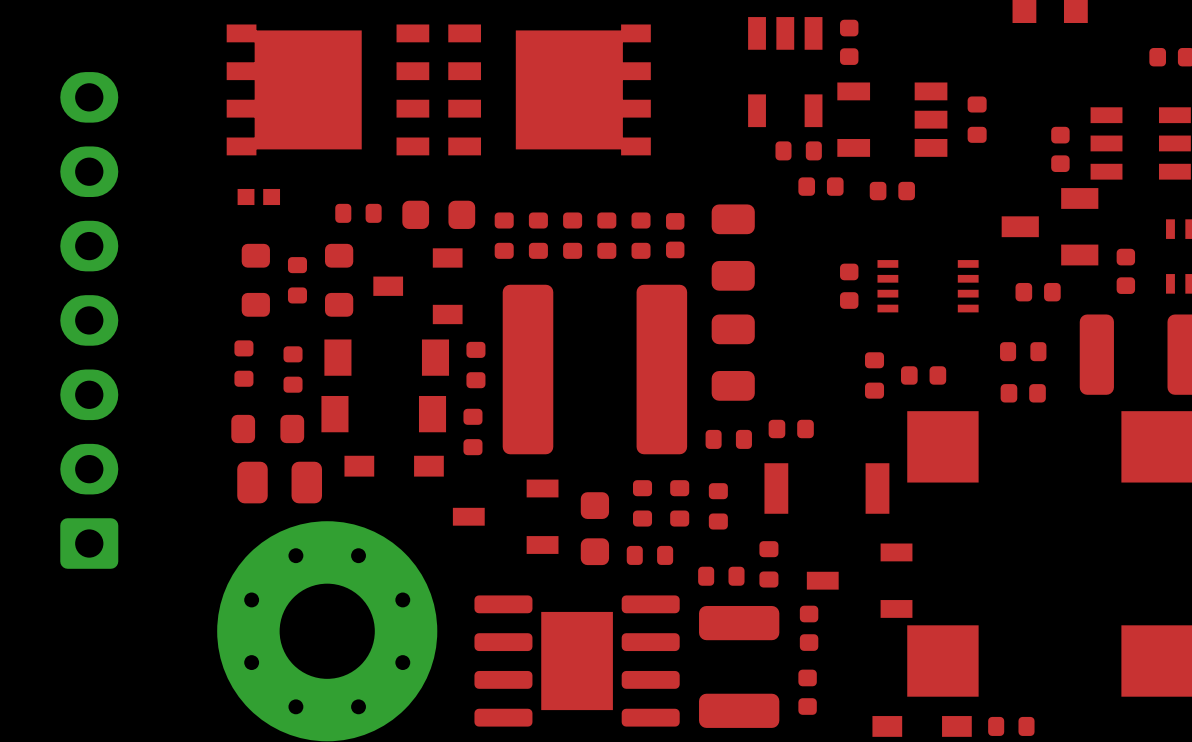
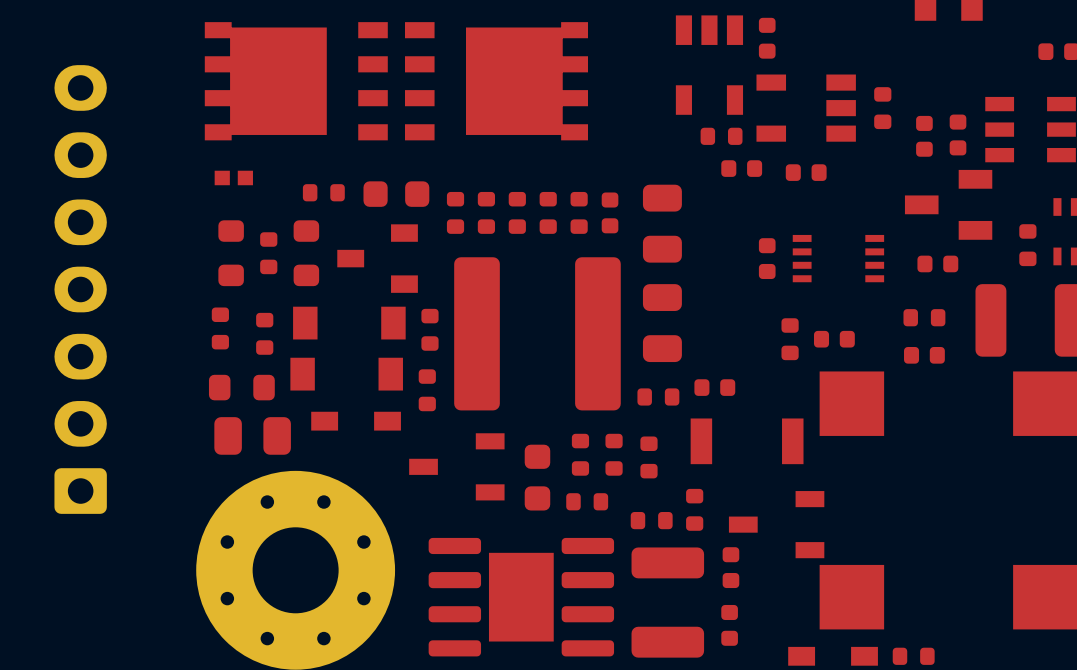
part: none -> (924, 136)
part footprint: [1116, 248, 1136, 294] -> [1019, 224, 1037, 267]

